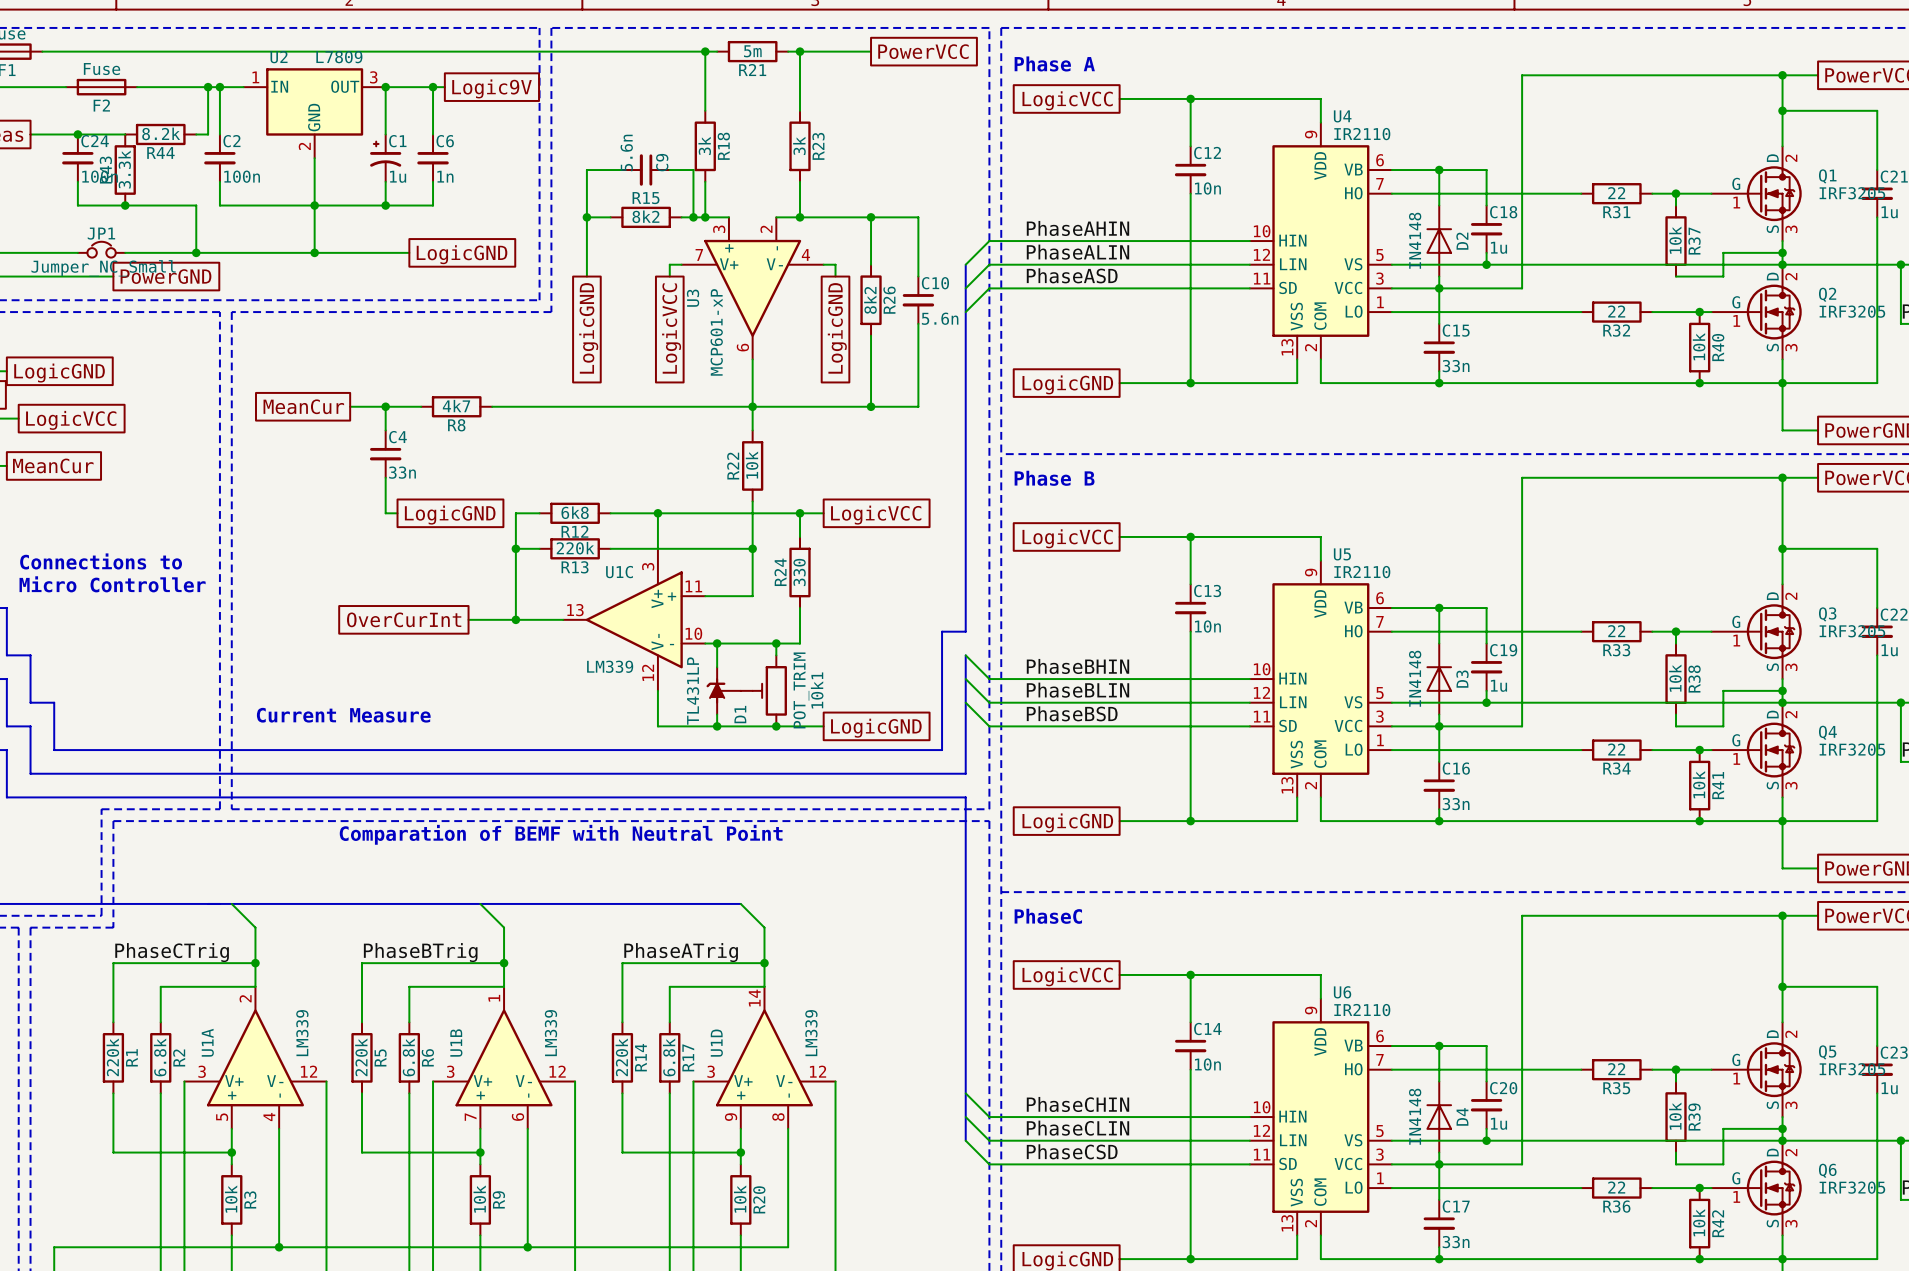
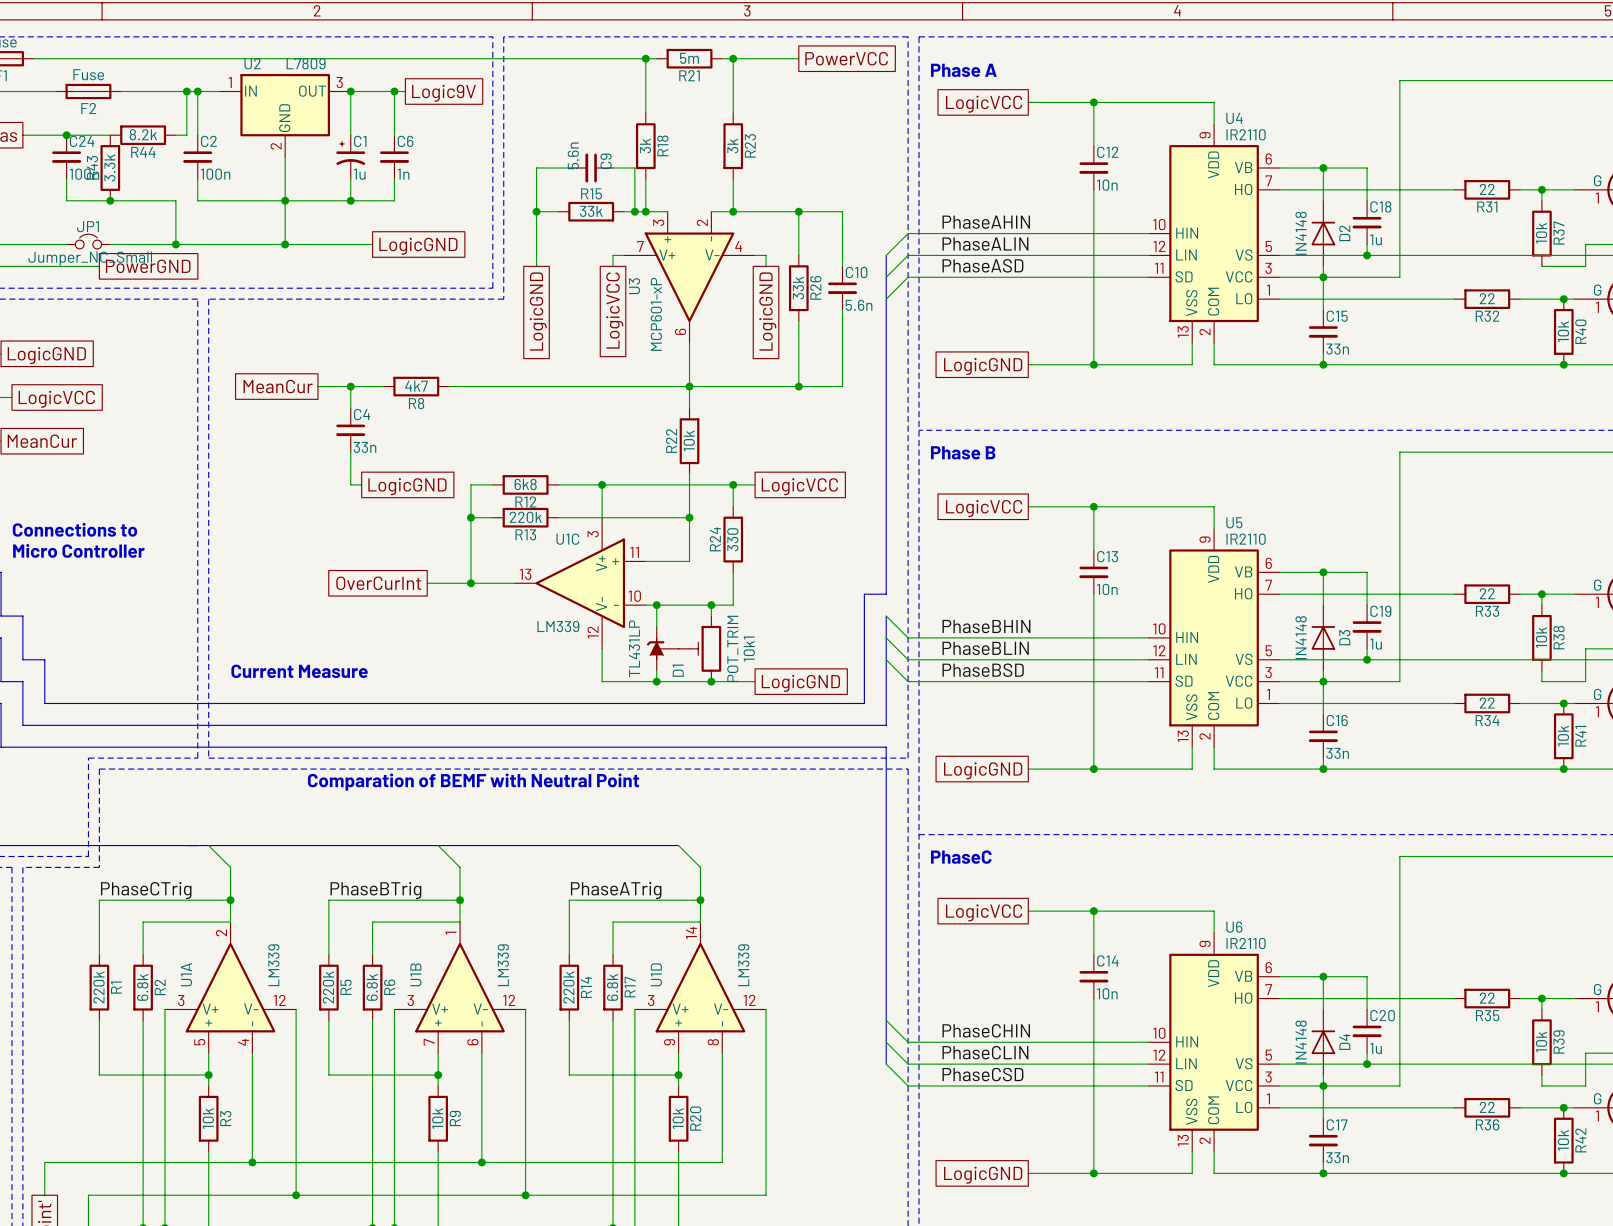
R15 value: 8k2 (645, 216) -> 33k (591, 211)
R26 value: 8k2 (870, 300) -> 33k (798, 288)

